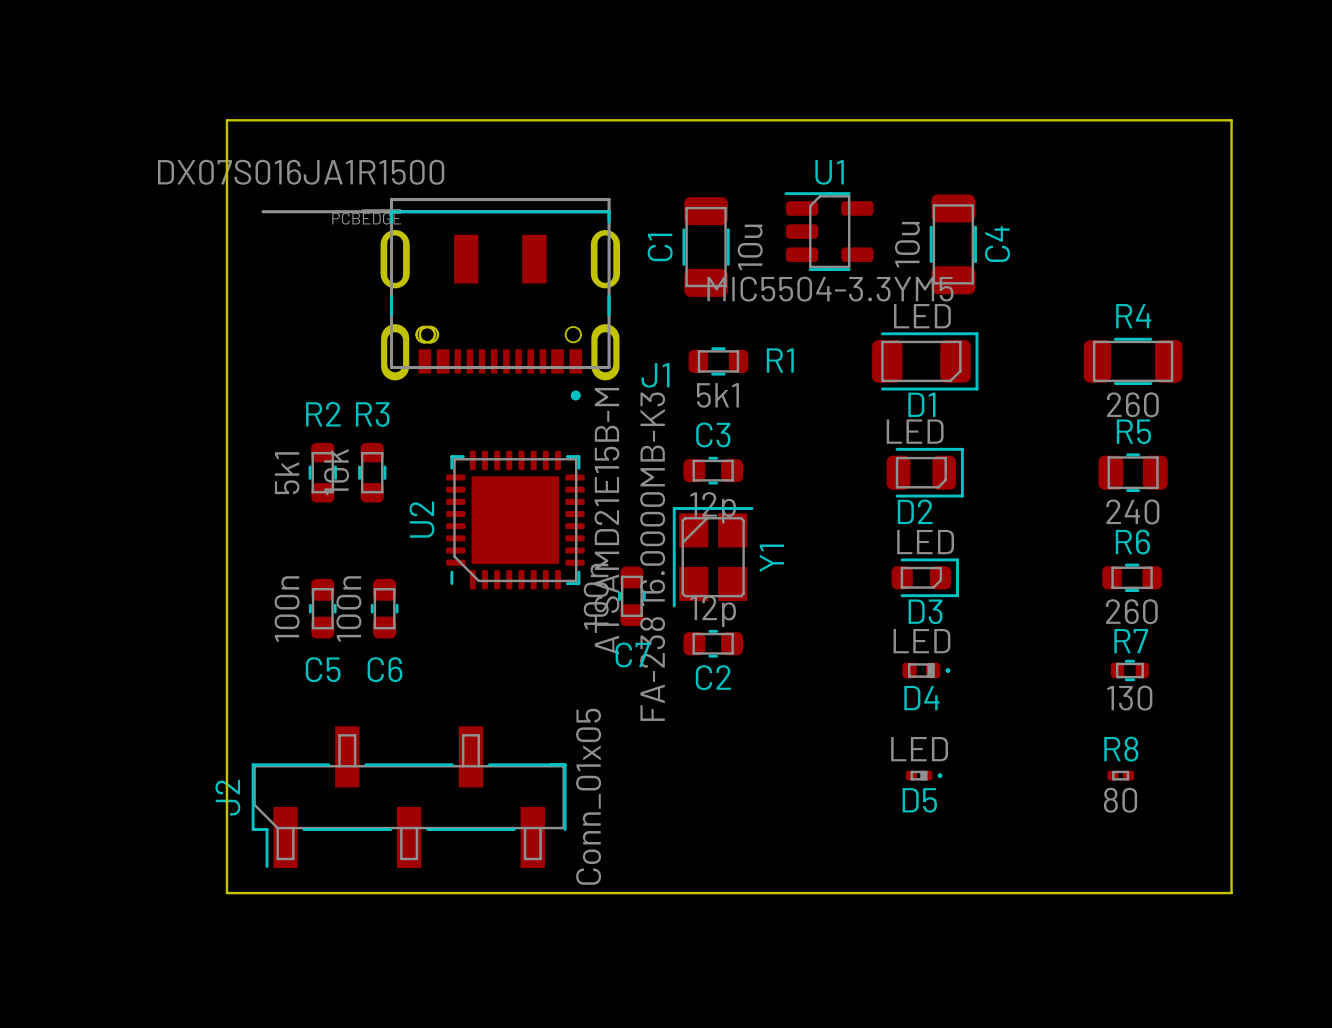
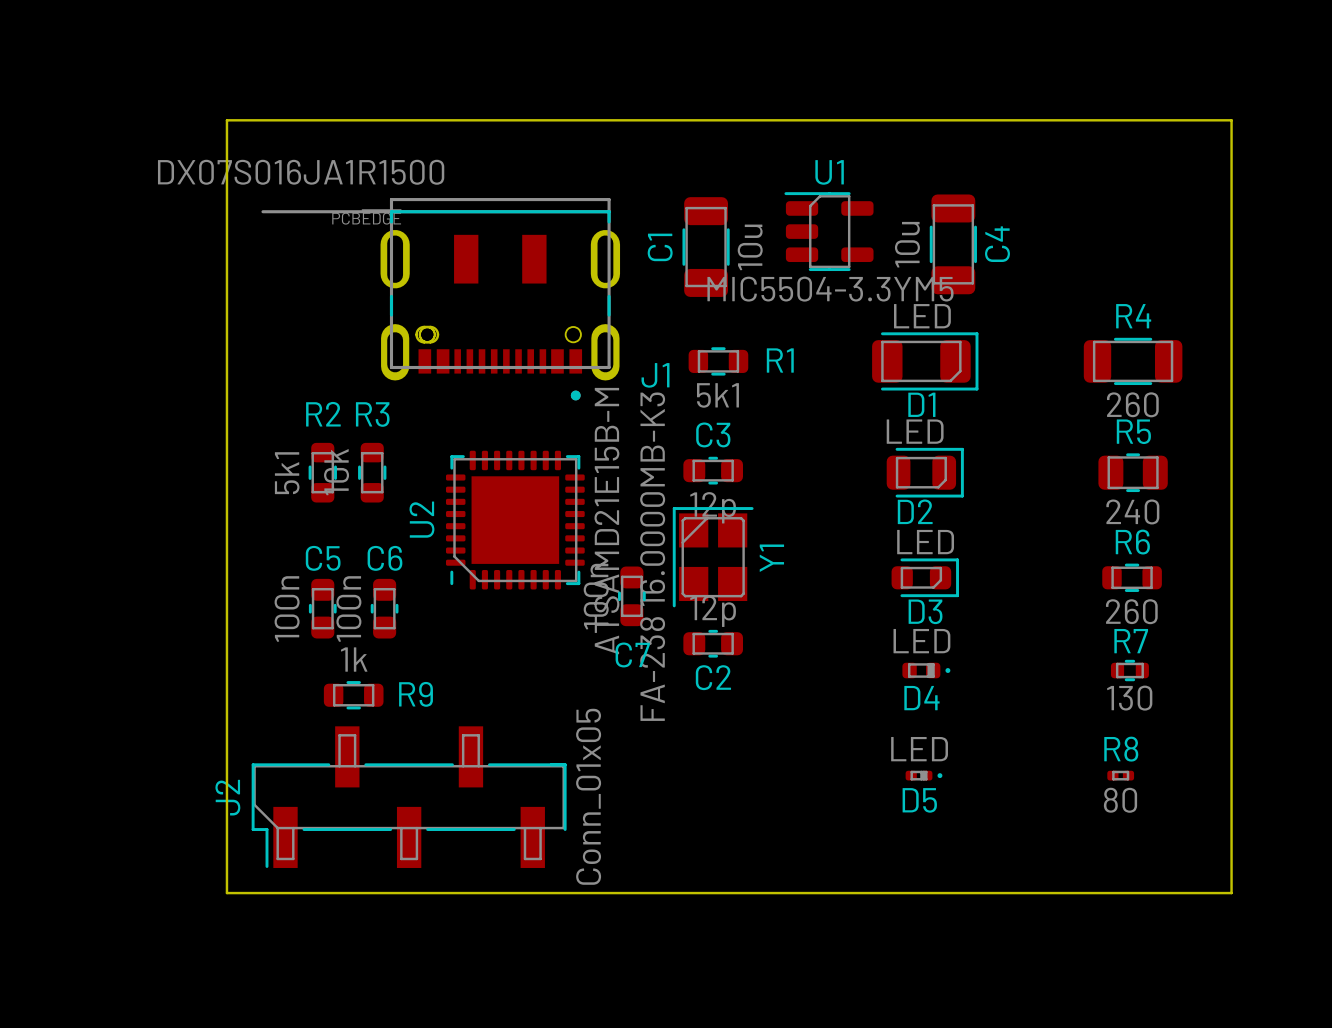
C5 name position: C5 (323, 669) -> C5 (323, 558)
C6 name position: C6 (384, 669) -> C6 (384, 558)
R9: none -> 1k (353, 695)

